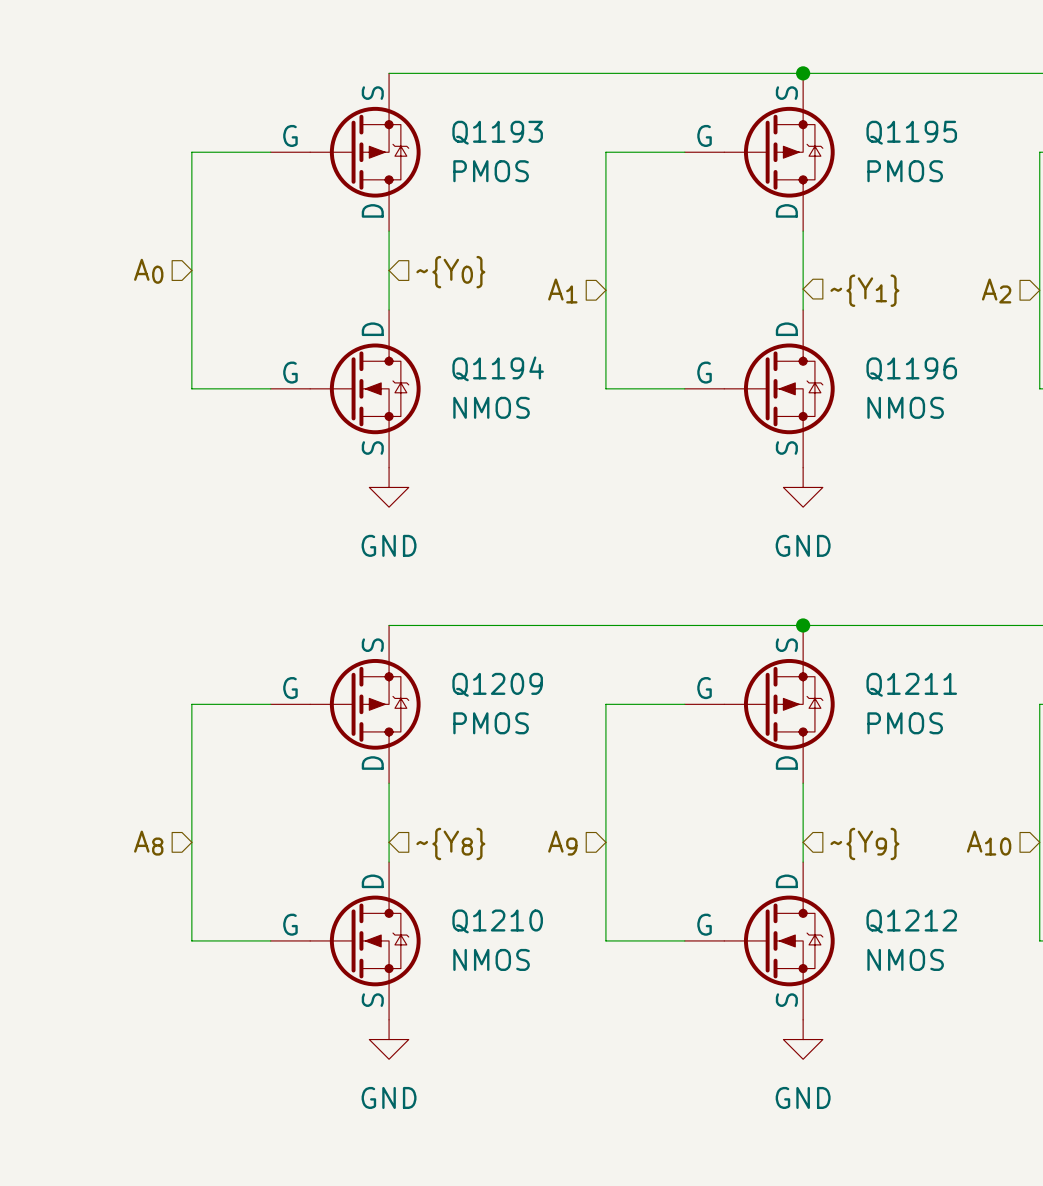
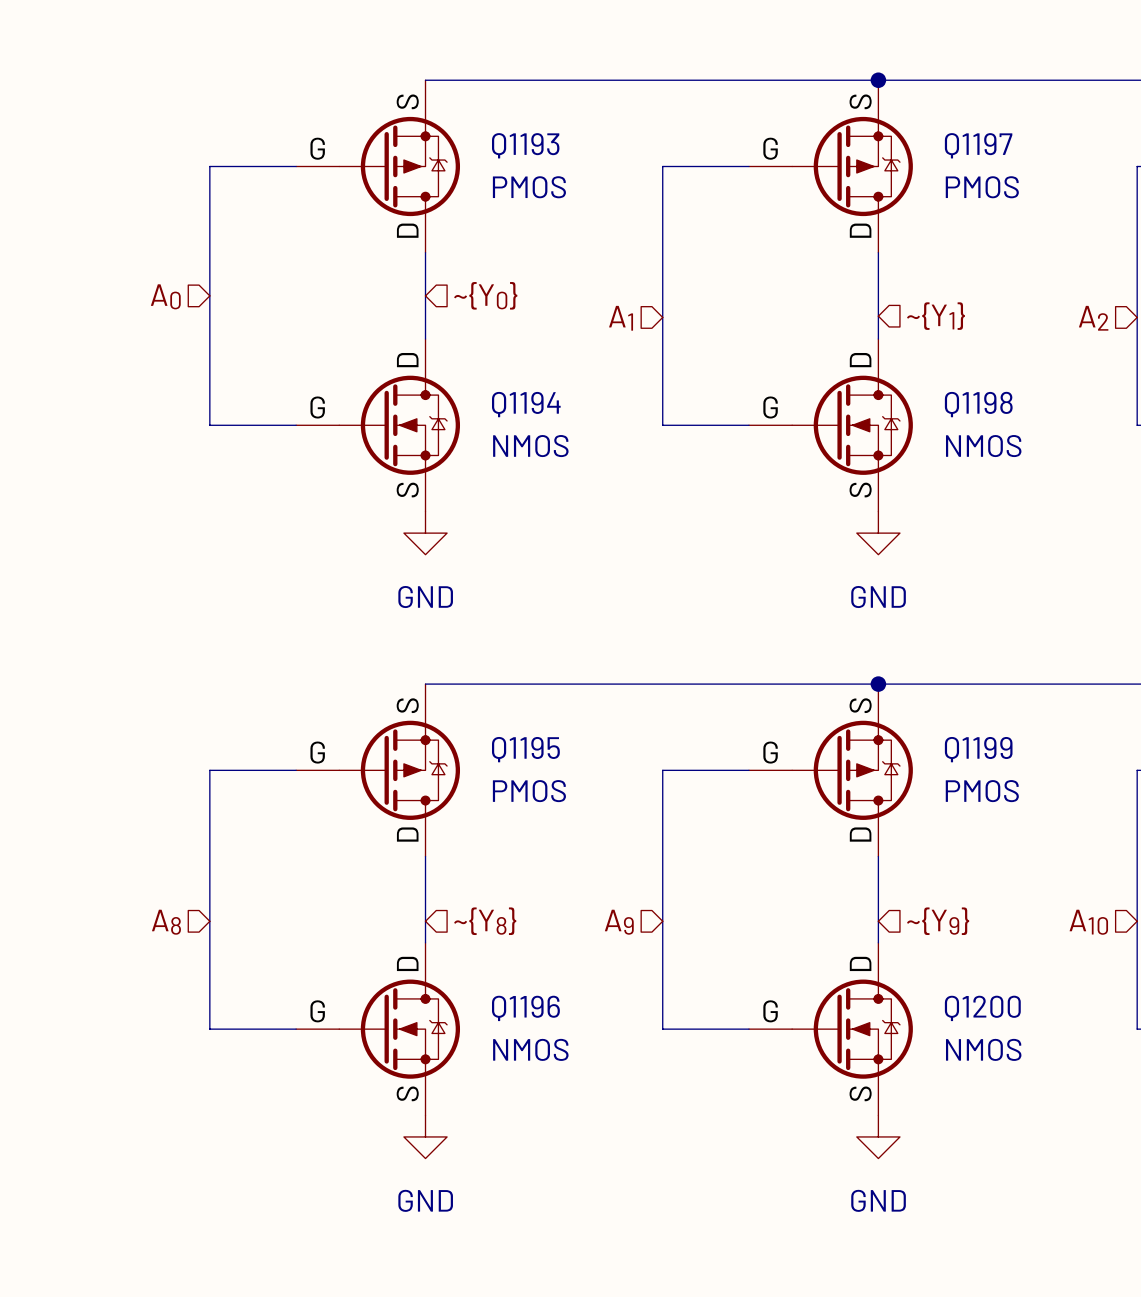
Q1195 name: Q1195 (911, 132) -> Q1197 (978, 145)
Q1196 name: Q1196 (911, 369) -> Q1198 (978, 404)
Q1209 name: Q1209 (497, 684) -> Q1195 (525, 749)
Q1211 name: Q1211 (911, 684) -> Q1199 (978, 749)
Q1210 name: Q1210 (497, 921) -> Q1196 (525, 1008)
Q1212 name: Q1212 (911, 921) -> Q1200 (982, 1008)

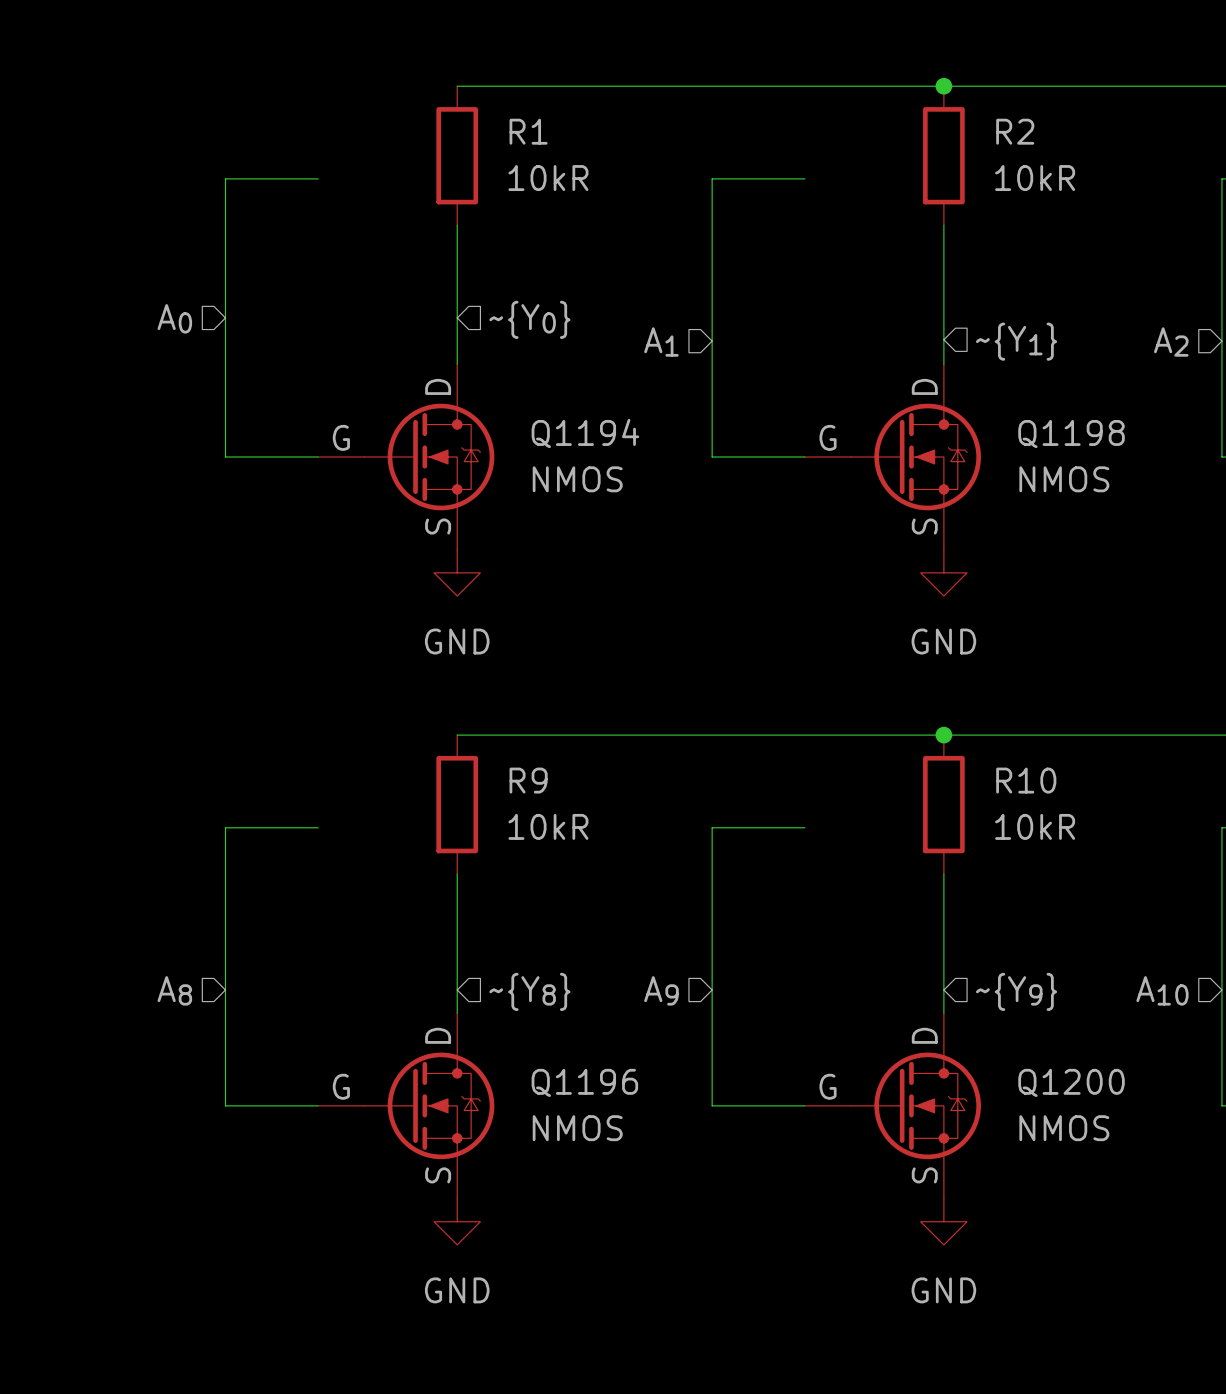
R1: none -> 10kR (457, 155)
R2: none -> 10kR (943, 155)
Q1193: PMOS (378, 166) -> none
Q1197: PMOS (830, 166) -> none
R9: none -> 10kR (457, 804)
R10: none -> 10kR (943, 804)
Q1195: PMOS (378, 770) -> none
Q1199: PMOS (830, 770) -> none

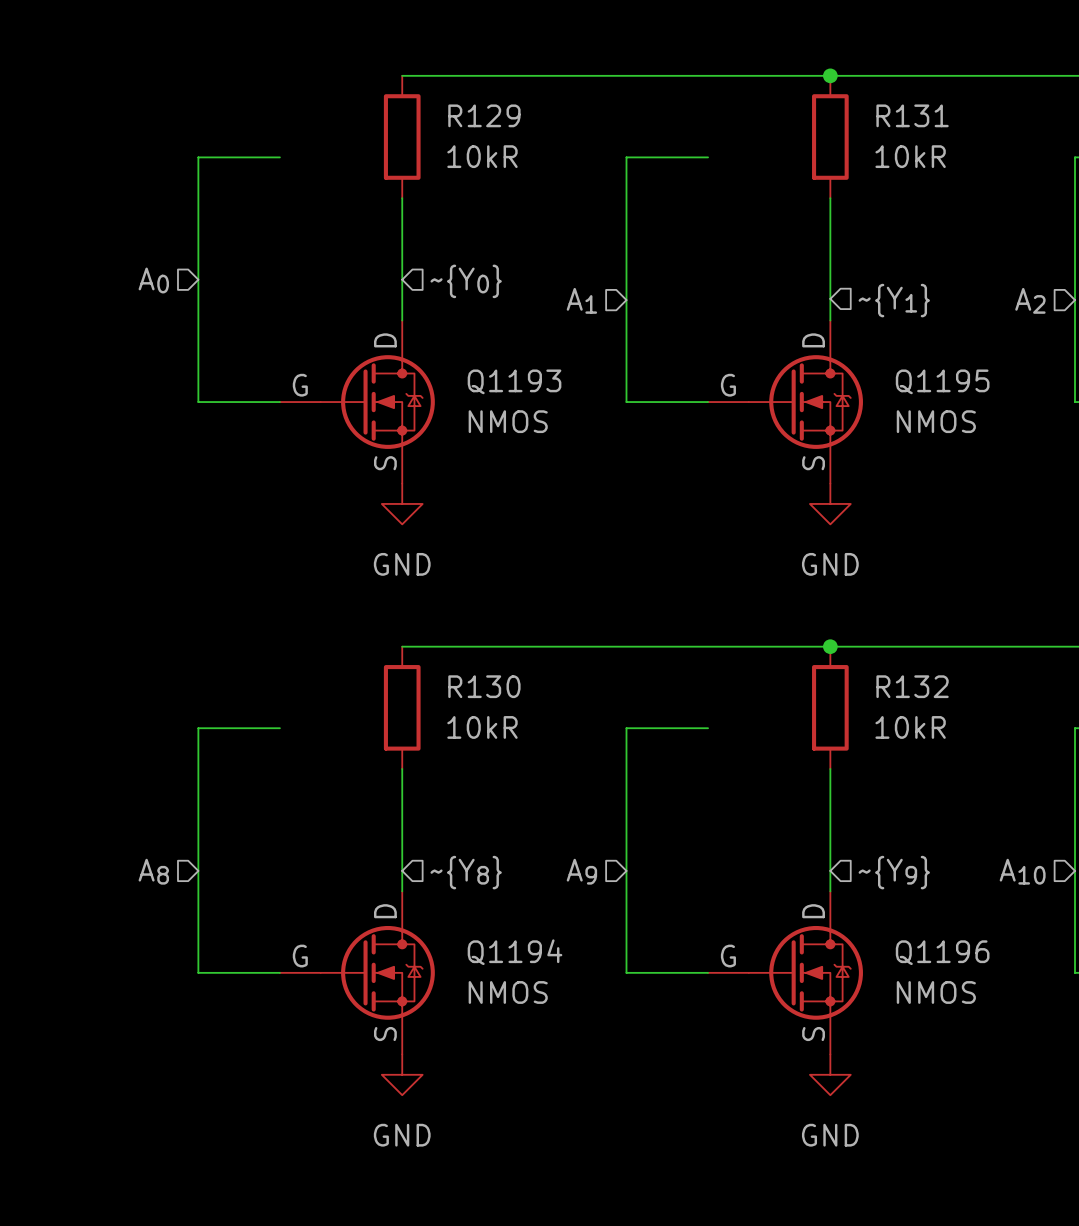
R1 name: R1 (528, 131) -> R129 (484, 115)
R2 name: R2 (1015, 131) -> R131 (912, 115)
Q1194 name: Q1194 (585, 433) -> Q1193 (514, 381)
Q1198 name: Q1198 (1071, 434) -> Q1195 (942, 381)
R9 name: R9 (528, 780) -> R130 (484, 686)
R10 name: R10 (1026, 780) -> R132 (912, 686)
Q1196 name: Q1196 (584, 1082) -> Q1194 (515, 952)
Q1200 name: Q1200 (1071, 1082) -> Q1196 (942, 952)

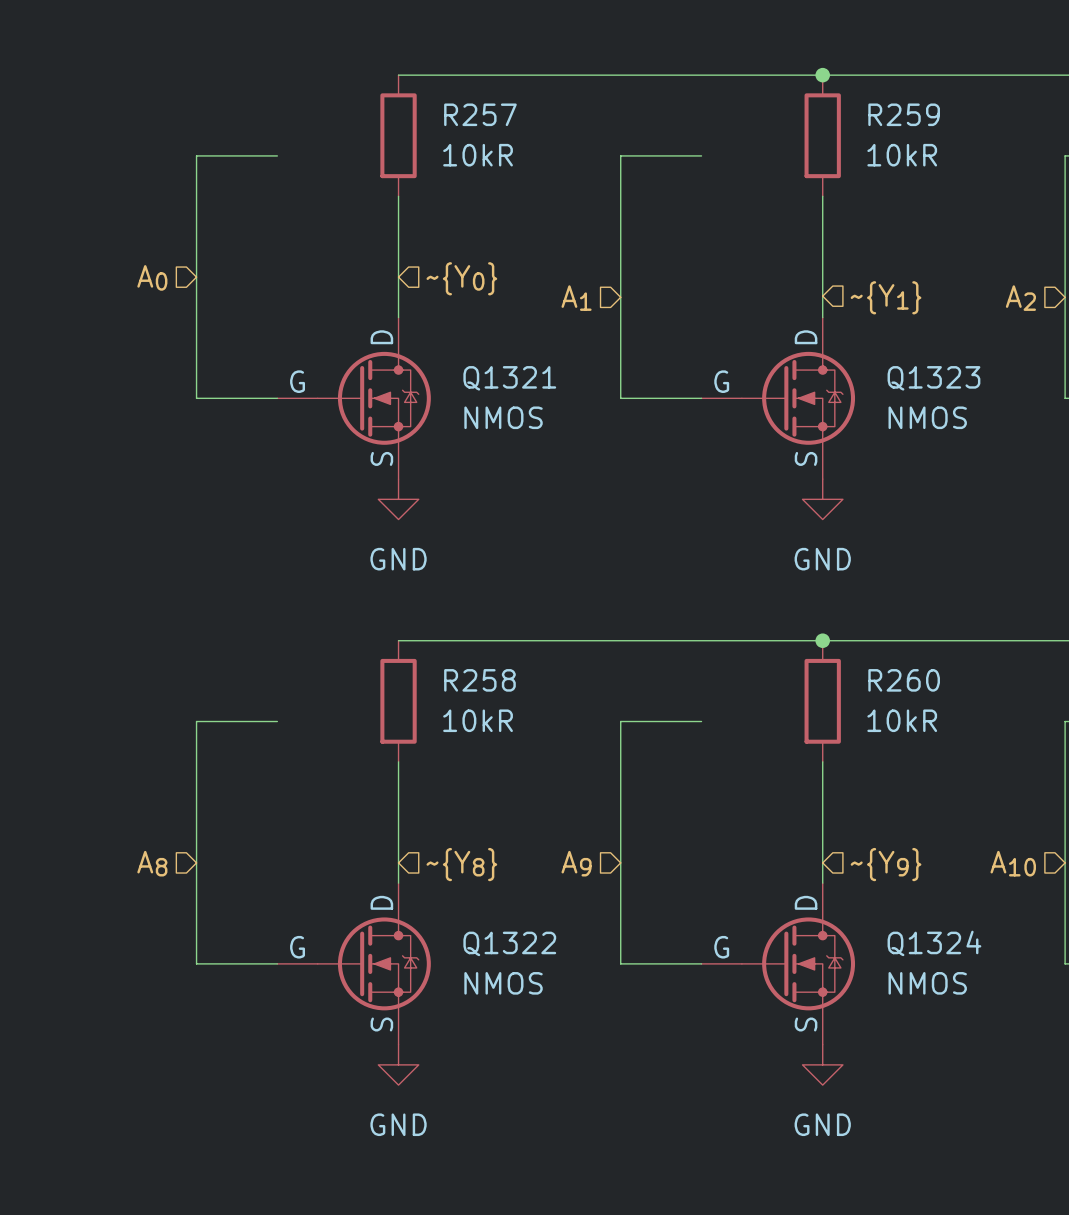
R129 name: R129 (484, 115) -> R257 (480, 114)
R131 name: R131 (912, 115) -> R259 (904, 114)
Q1193 name: Q1193 (514, 381) -> Q1321 (509, 378)
Q1195 name: Q1195 (942, 381) -> Q1323 (933, 378)
R130 name: R130 (484, 686) -> R258 (479, 680)
R132 name: R132 (912, 686) -> R260 (904, 680)
Q1194 name: Q1194 (515, 952) -> Q1322 (509, 943)
Q1196 name: Q1196 (942, 952) -> Q1324 (934, 943)

